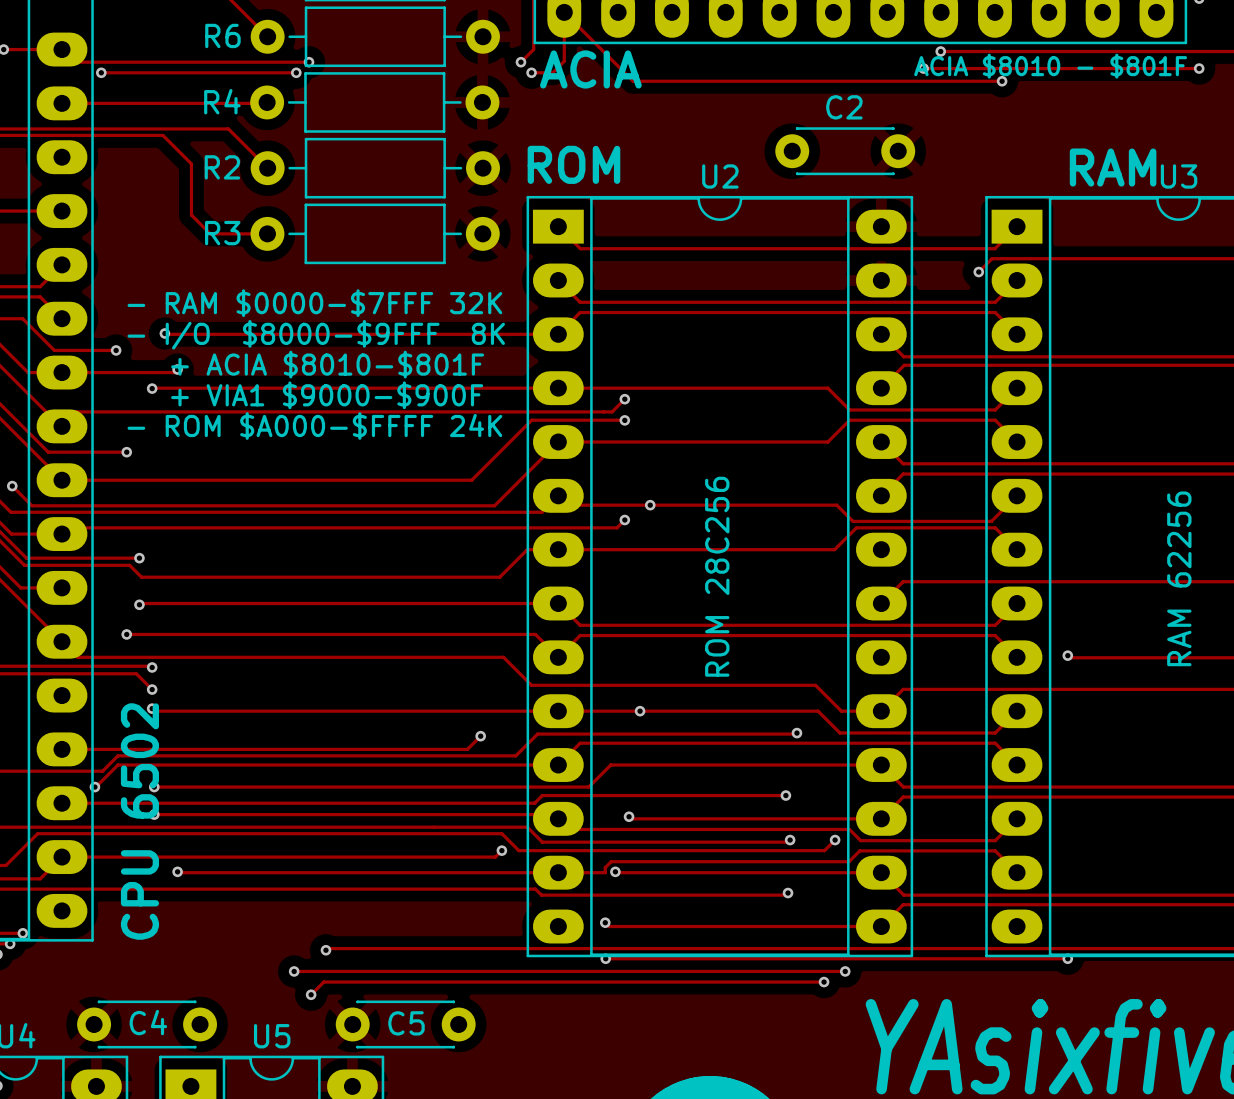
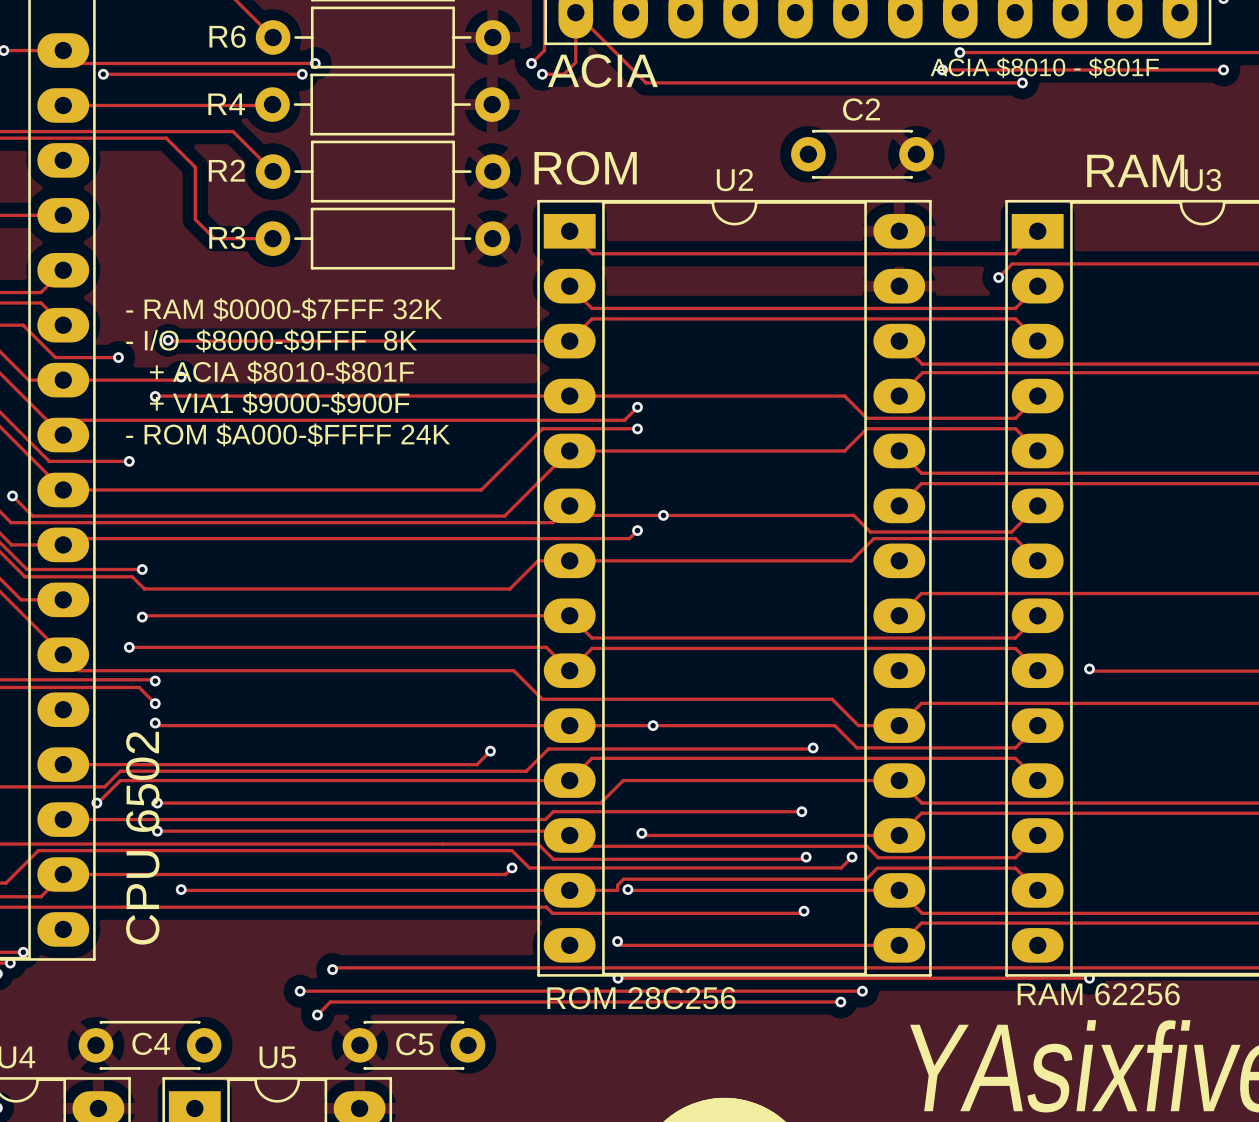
U2 value rotation: 0° (717, 576) -> 90° clockwise (641, 998)
U2 value position: ROM 28C256 (717, 576) -> ROM 28C256 (641, 998)
U3 value rotation: 0° (1179, 578) -> 90° clockwise (1098, 994)
U3 value position: RAM 62256 (1179, 578) -> RAM 62256 (1098, 994)

